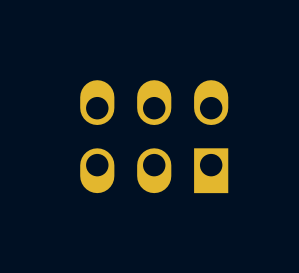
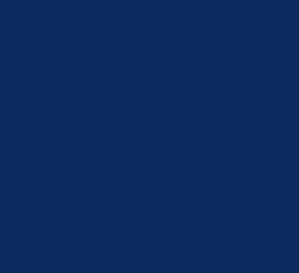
part: (154, 136) -> none

